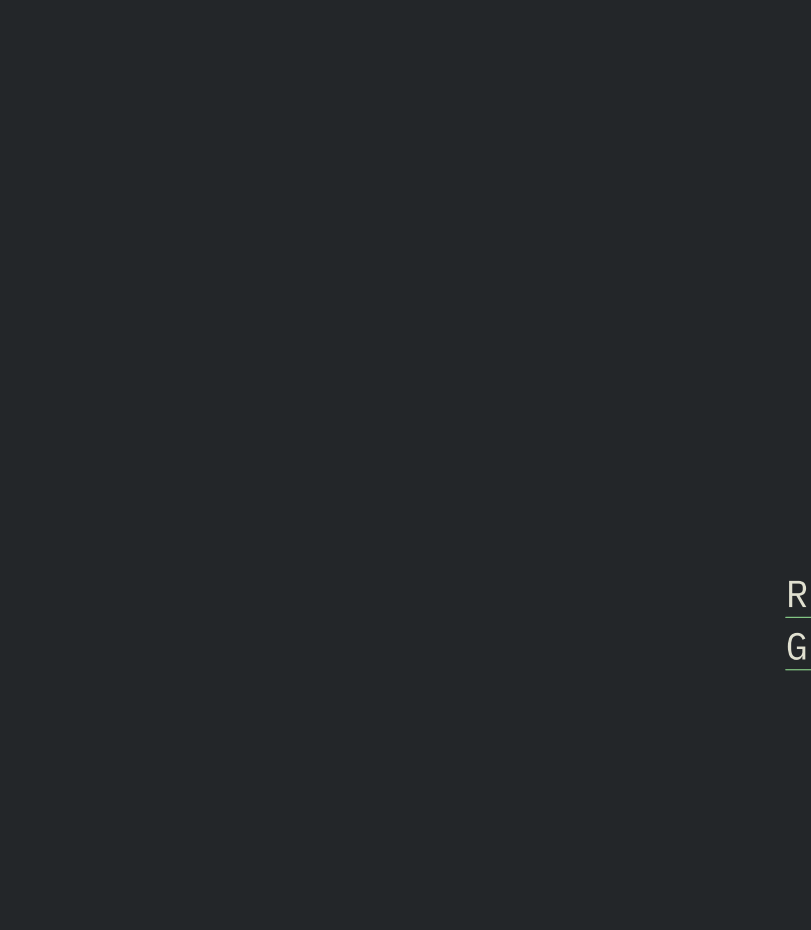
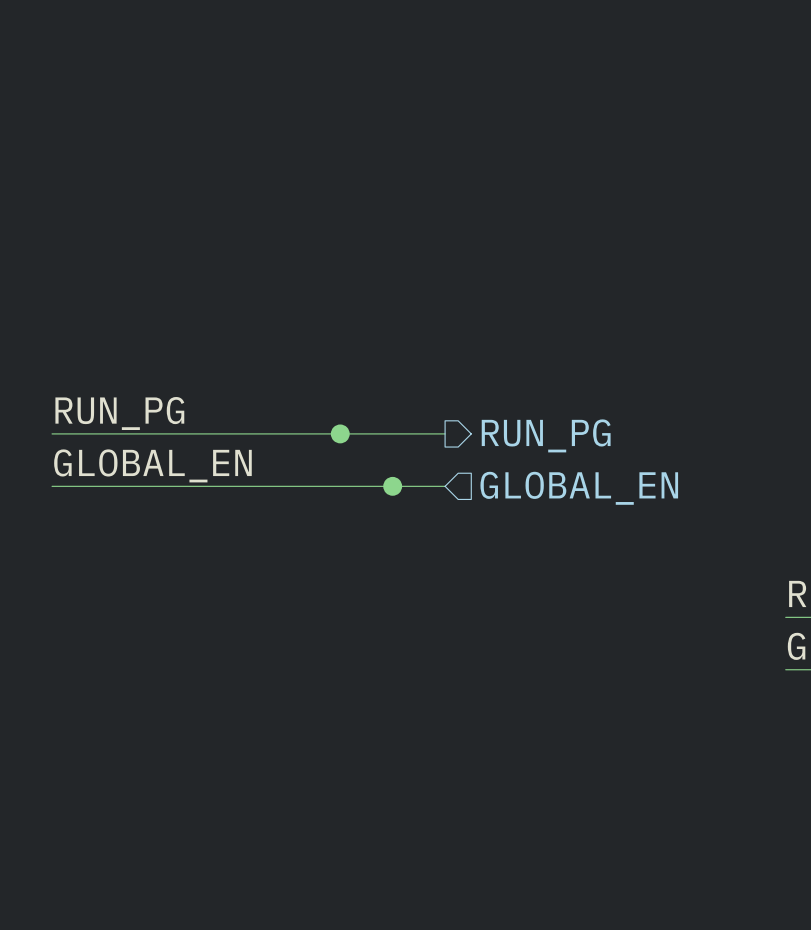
label: none -> RUN_PG (119, 413)
wire: none -> (52, 433) (445, 433)
junction: none -> (340, 433)
sheet pin: none -> RUN_PG (546, 435)
label: none -> GLOBAL_EN (152, 465)
wire: none -> (52, 486) (445, 486)
junction: none -> (392, 486)
sheet pin: none -> GLOBAL_EN (579, 488)

